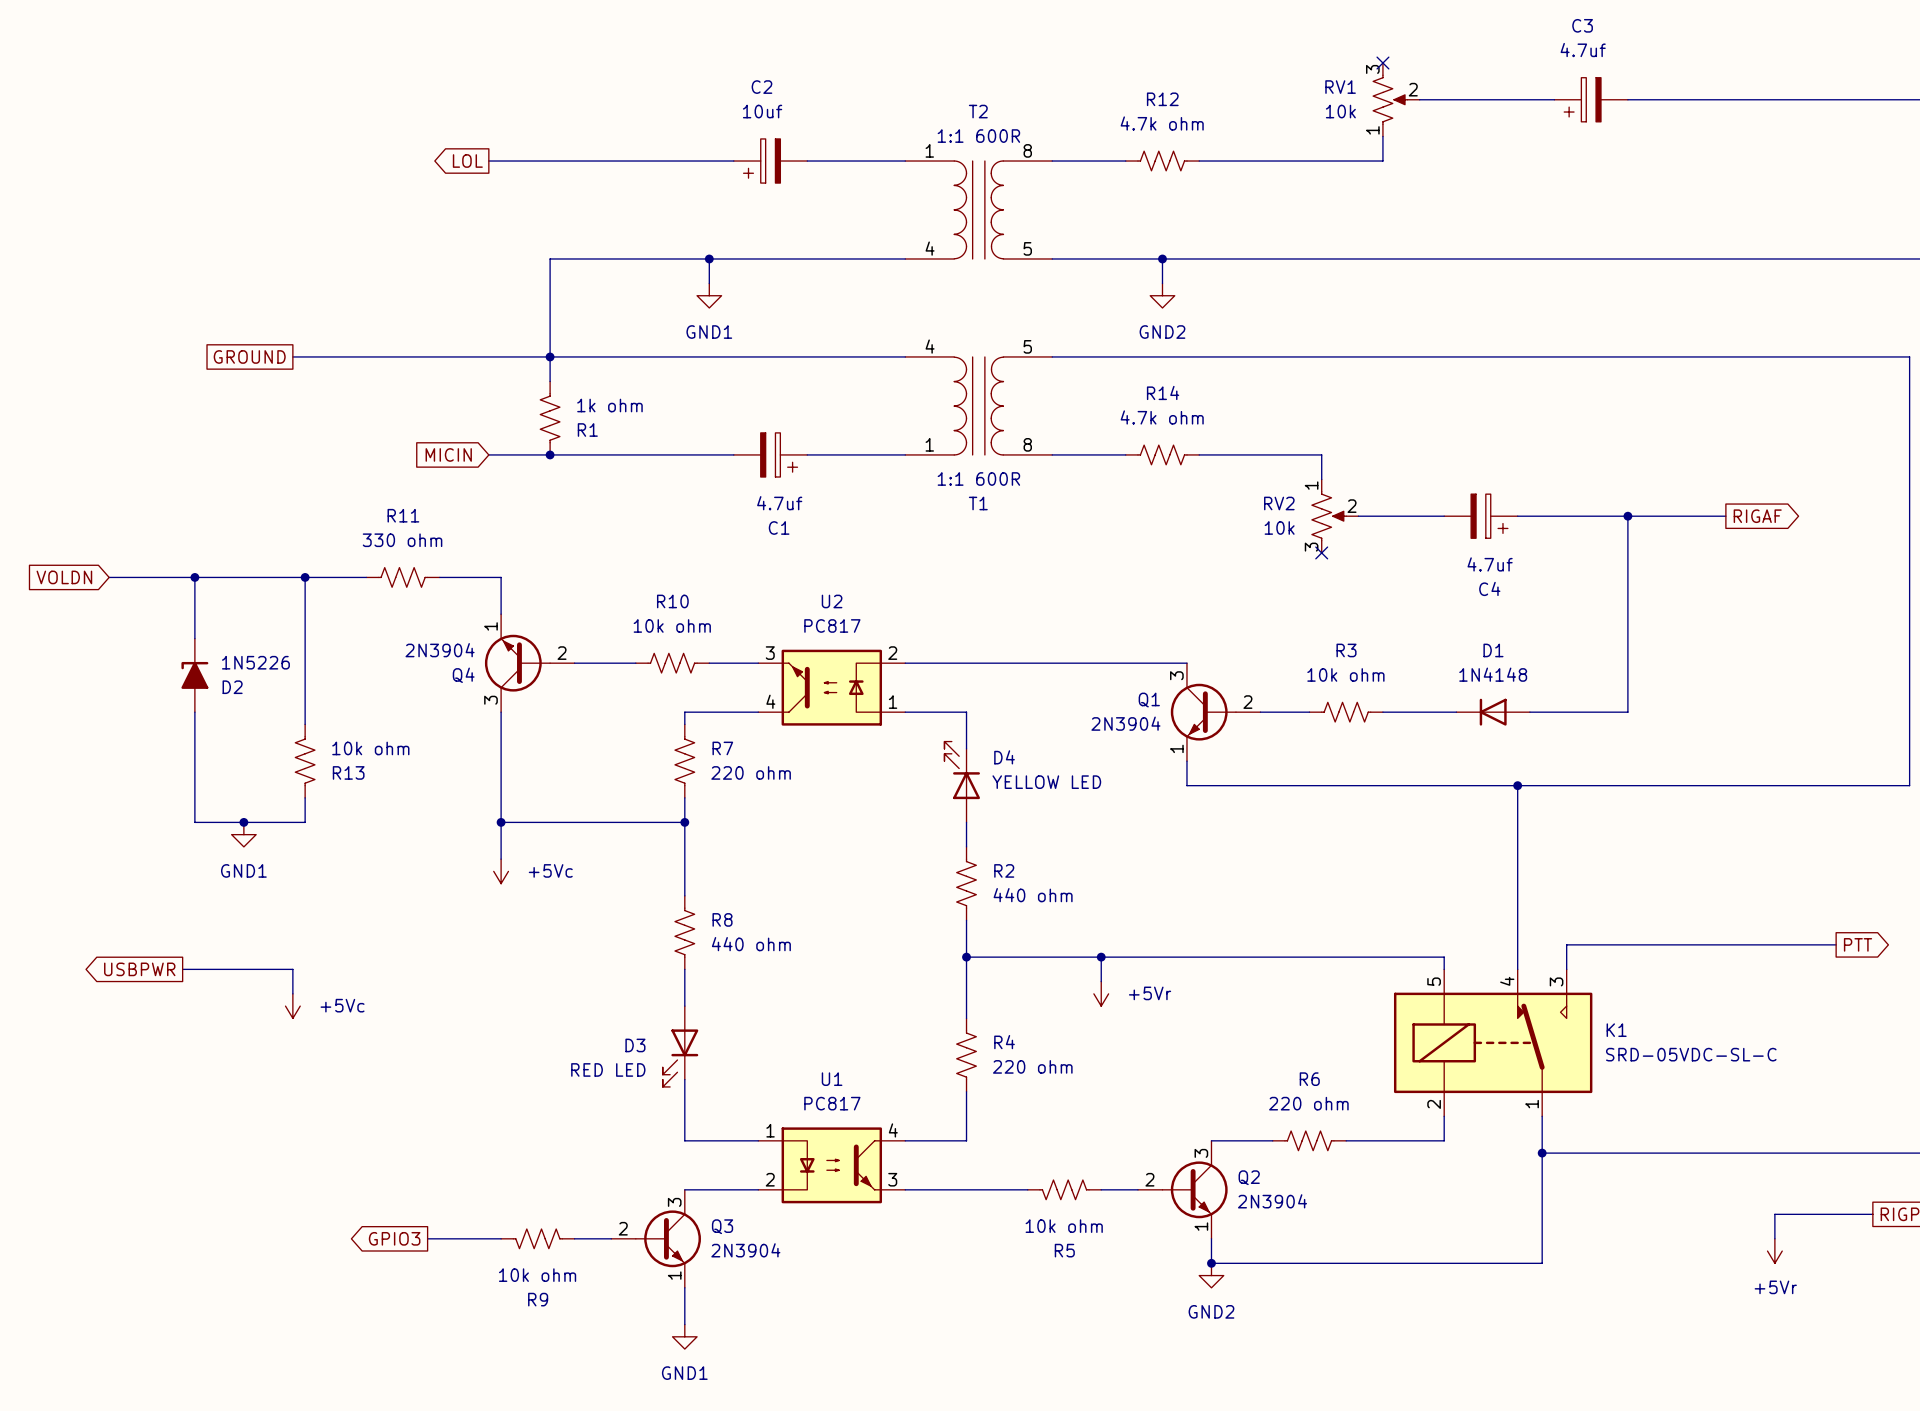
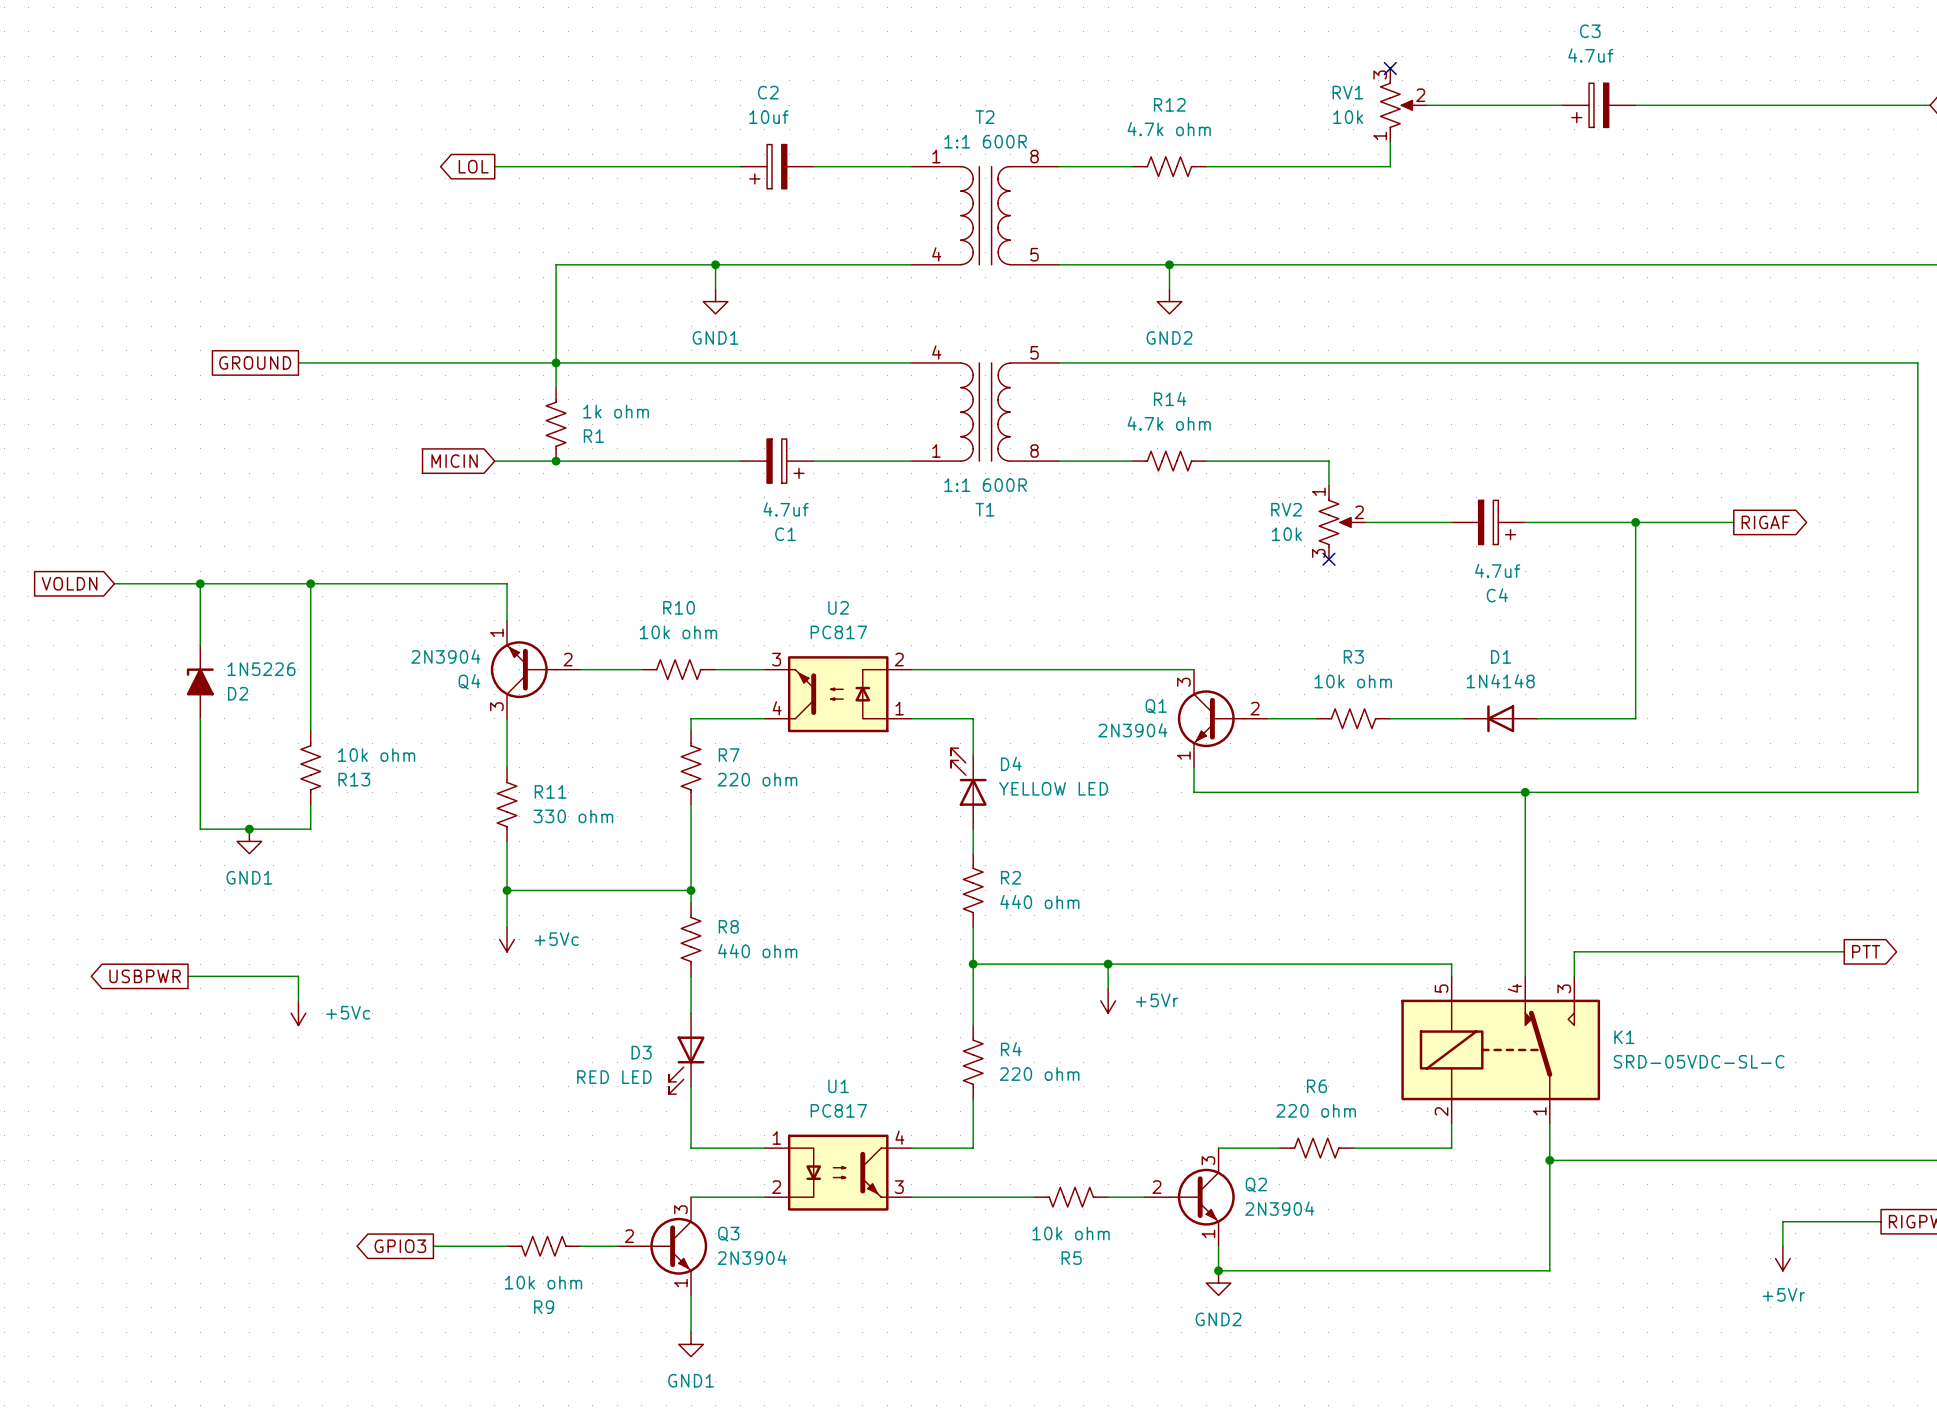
R11 name position: R11 (403, 515) -> R11 (550, 791)
R11 value position: 330 ohm (402, 540) -> 330 ohm (573, 816)
R11 rotation: 0° (403, 577) -> 90° clockwise (507, 804)
R11 position: (403, 577) -> (507, 804)
wire: (501, 822) (684, 822) -> (507, 890) (691, 890)
junction: (501, 822) -> none
junction: (684, 822) -> none
wire: none -> (507, 865) (507, 927)
power symbol position: +5Vc (501, 871) -> +5Vc (507, 939)
junction: none -> (507, 890)
junction: none -> (691, 890)

